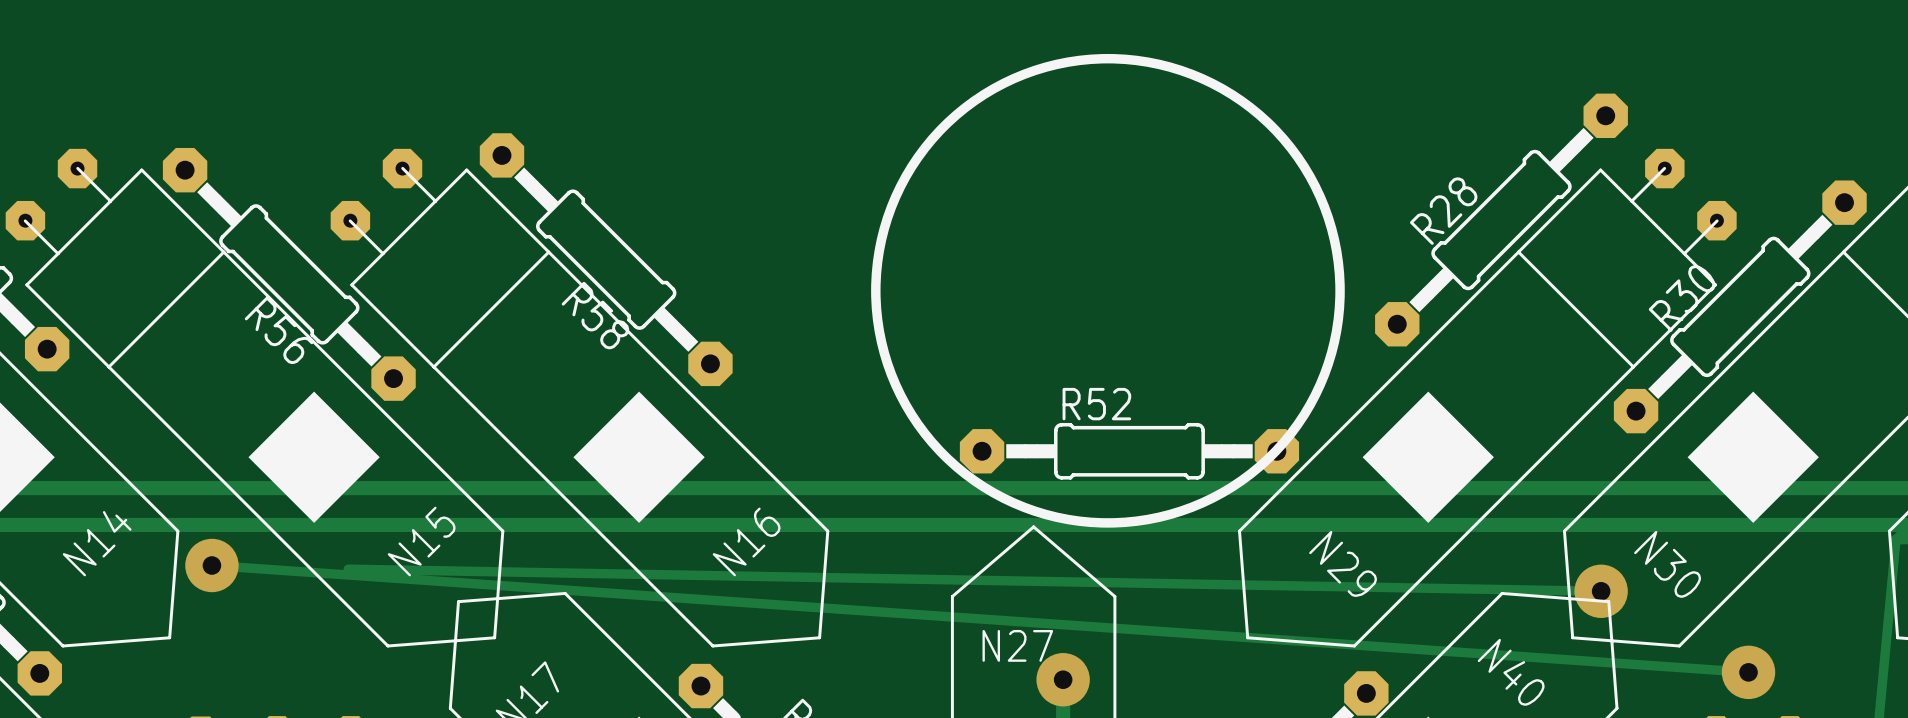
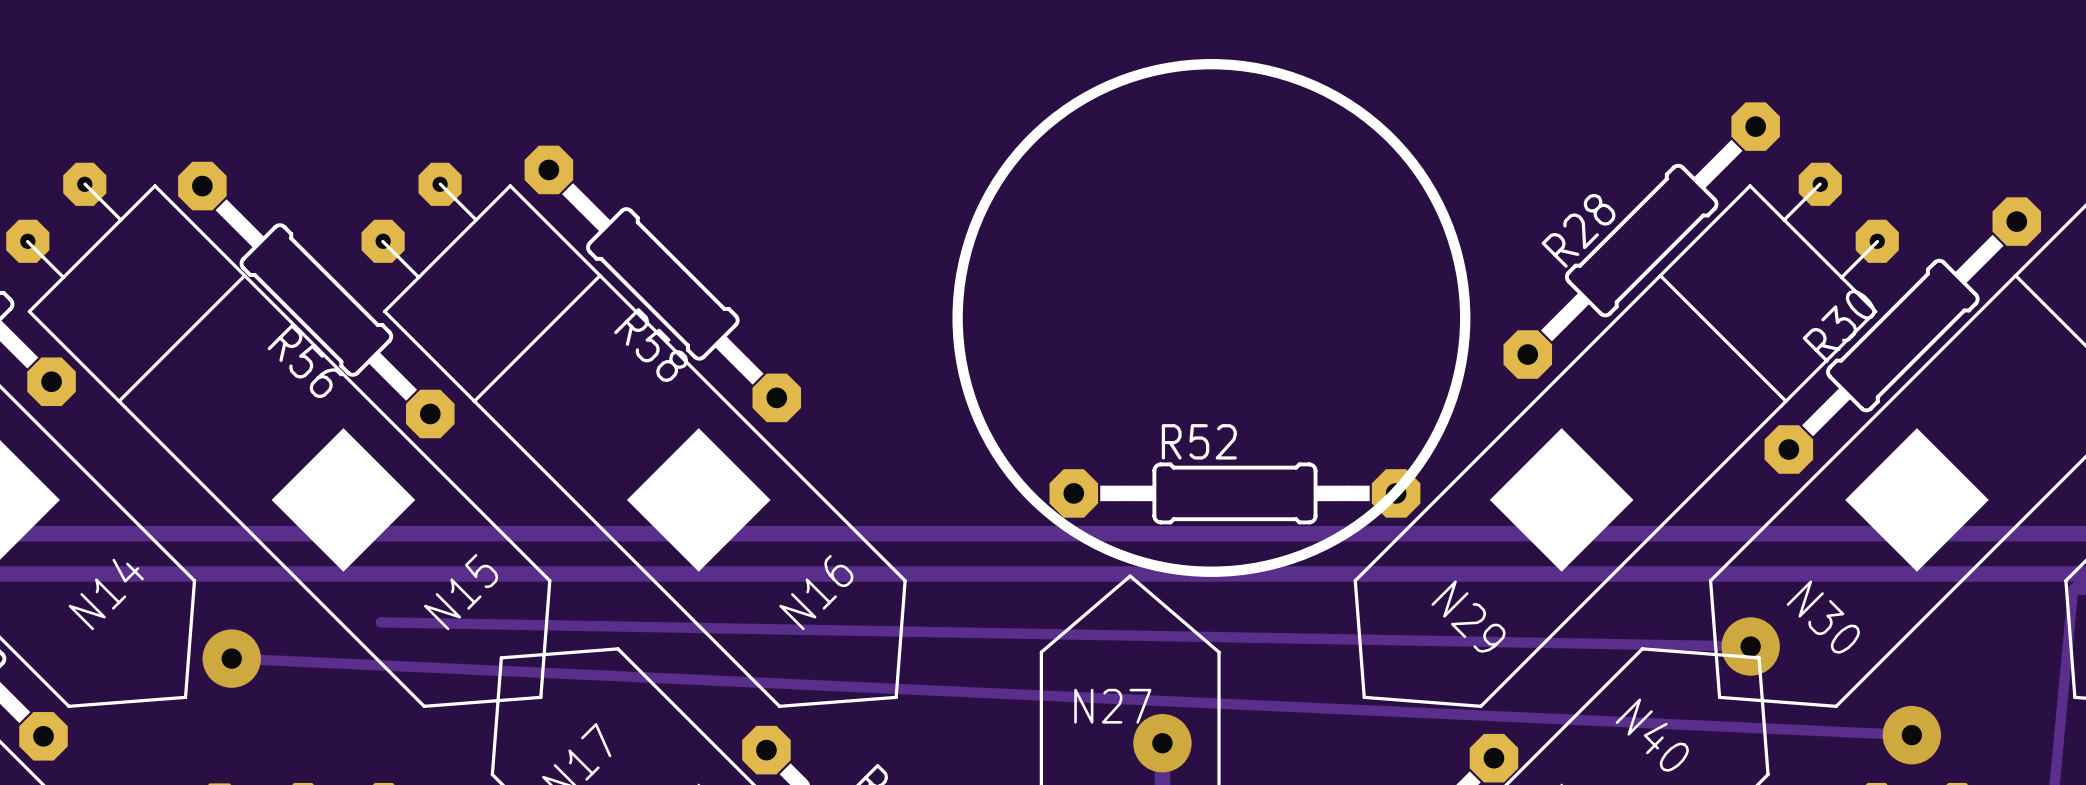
track: (211, 565) (1748, 672) -> (231, 658) (1911, 735)
via position: (211, 565) -> (231, 658)

